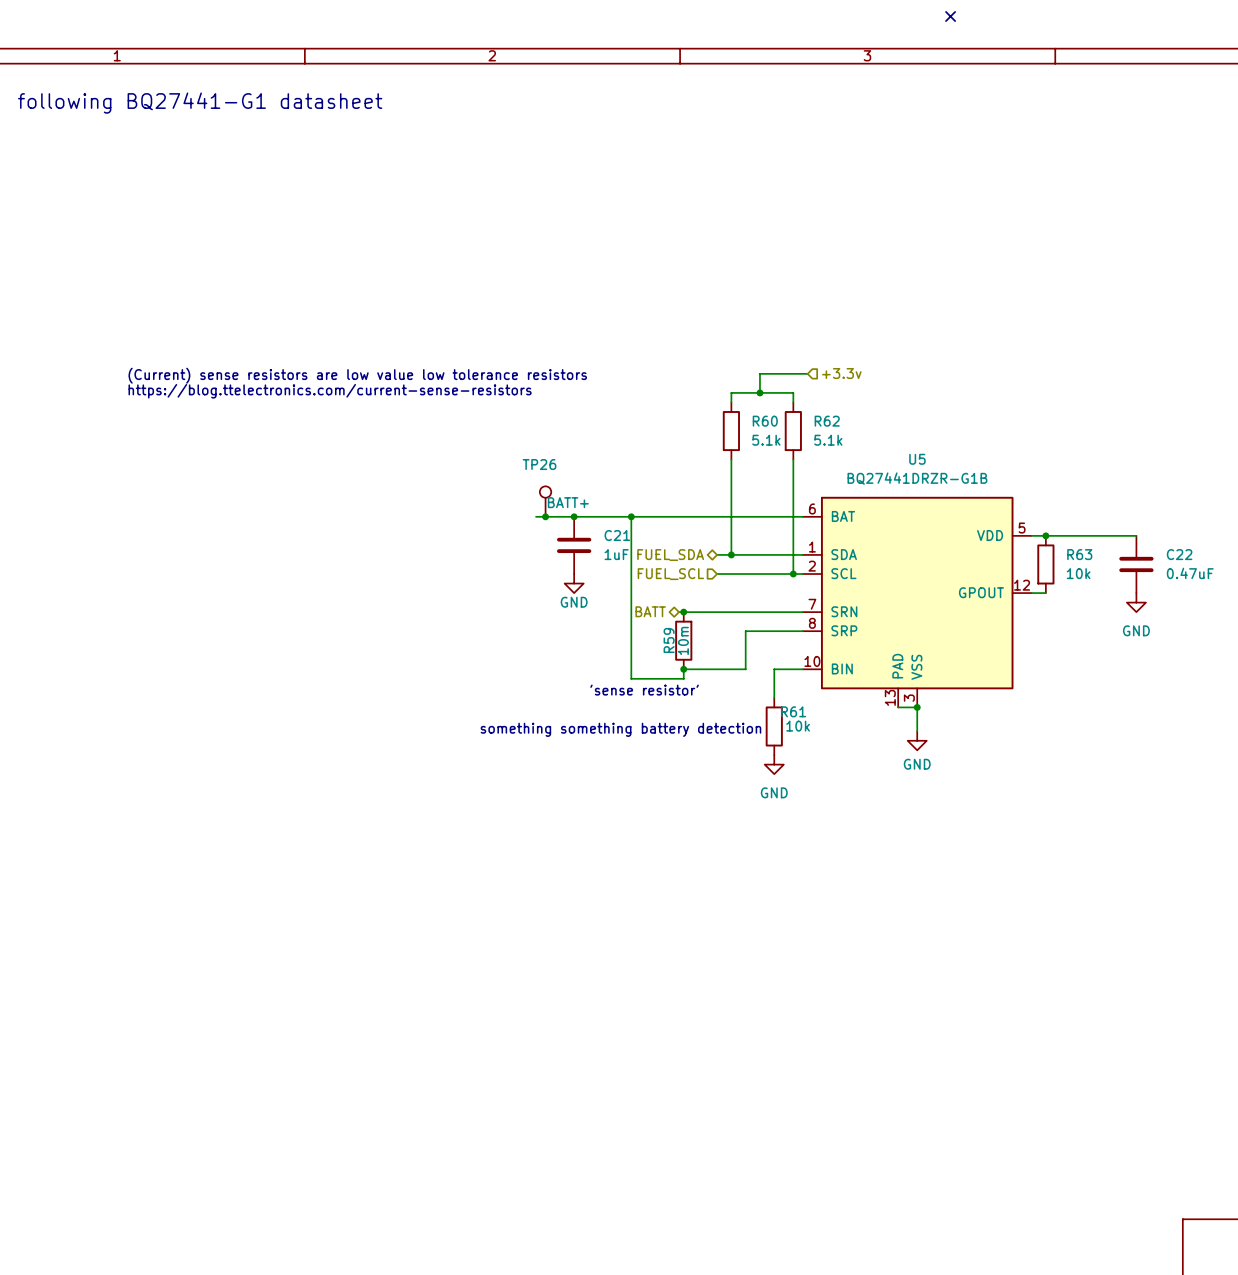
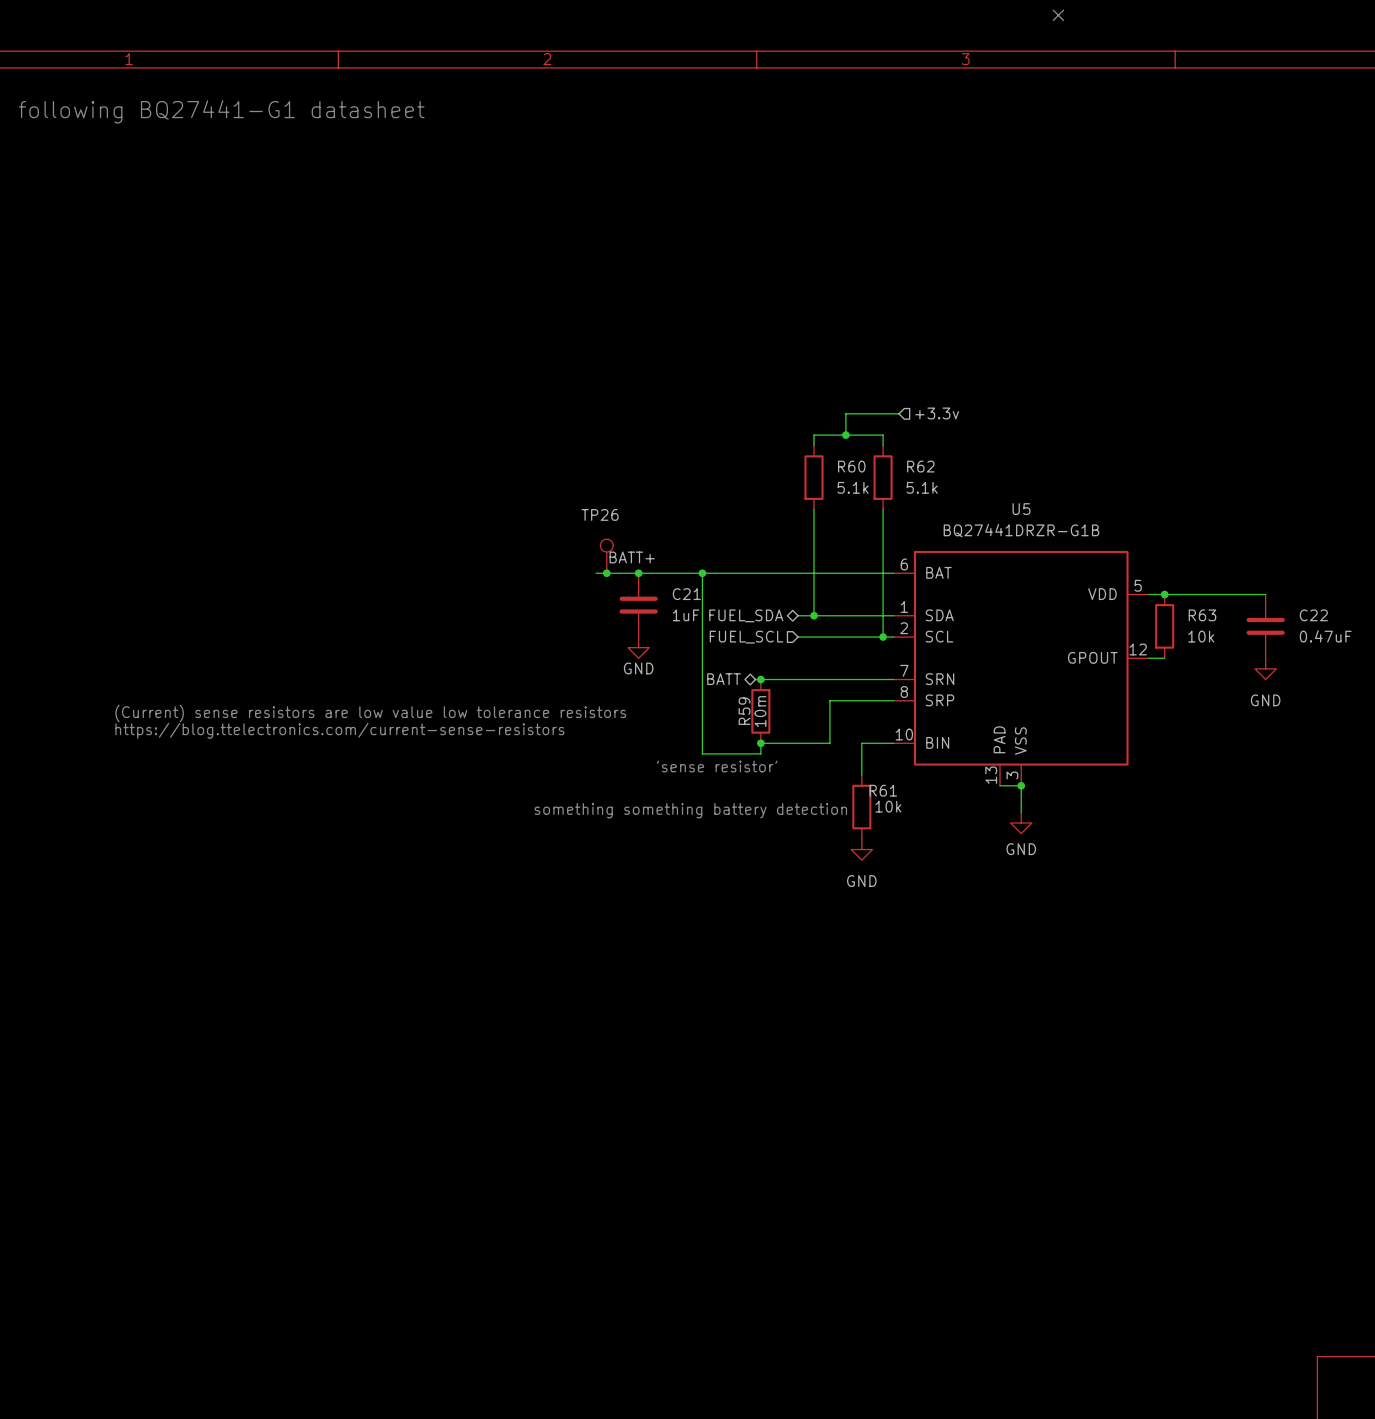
text: (Current) sense resistors are low value low tolerance resistors (357, 375) -> none
text: https://blog.ttelectronics.com/current-sense-resistors (330, 391) -> none
text: none -> (Current) sense resistors are low value low tolerance resistors (370, 713)
text: none -> https://blog.ttelectronics.com/current-sense-resistors (339, 730)

